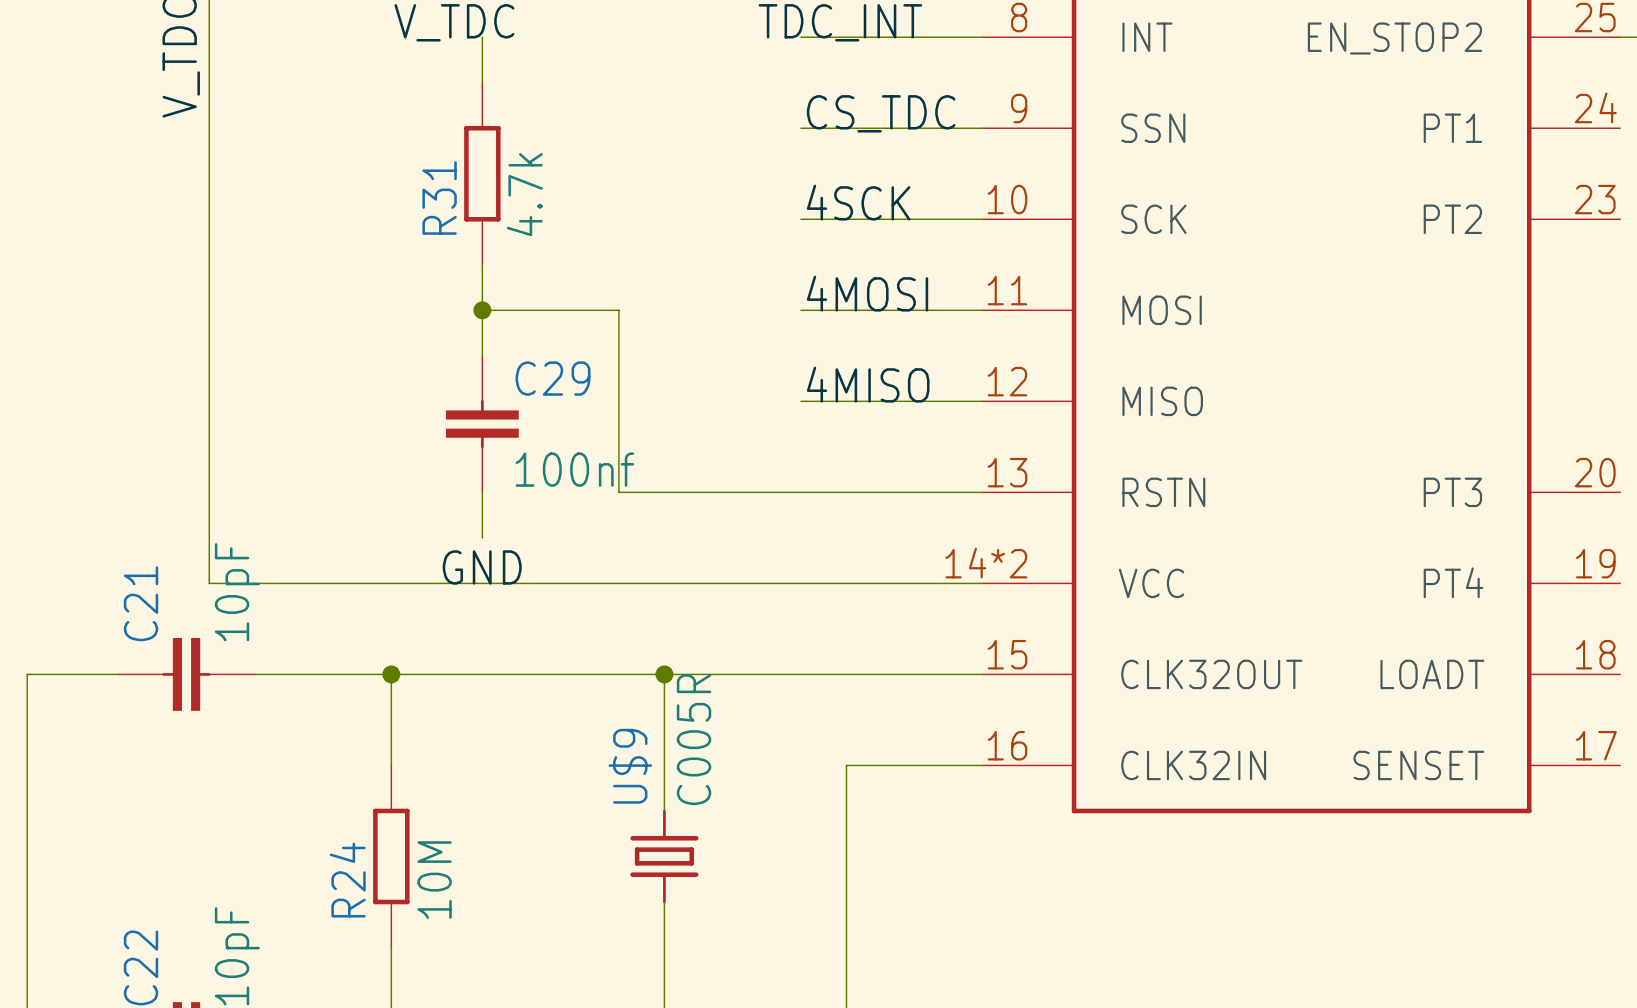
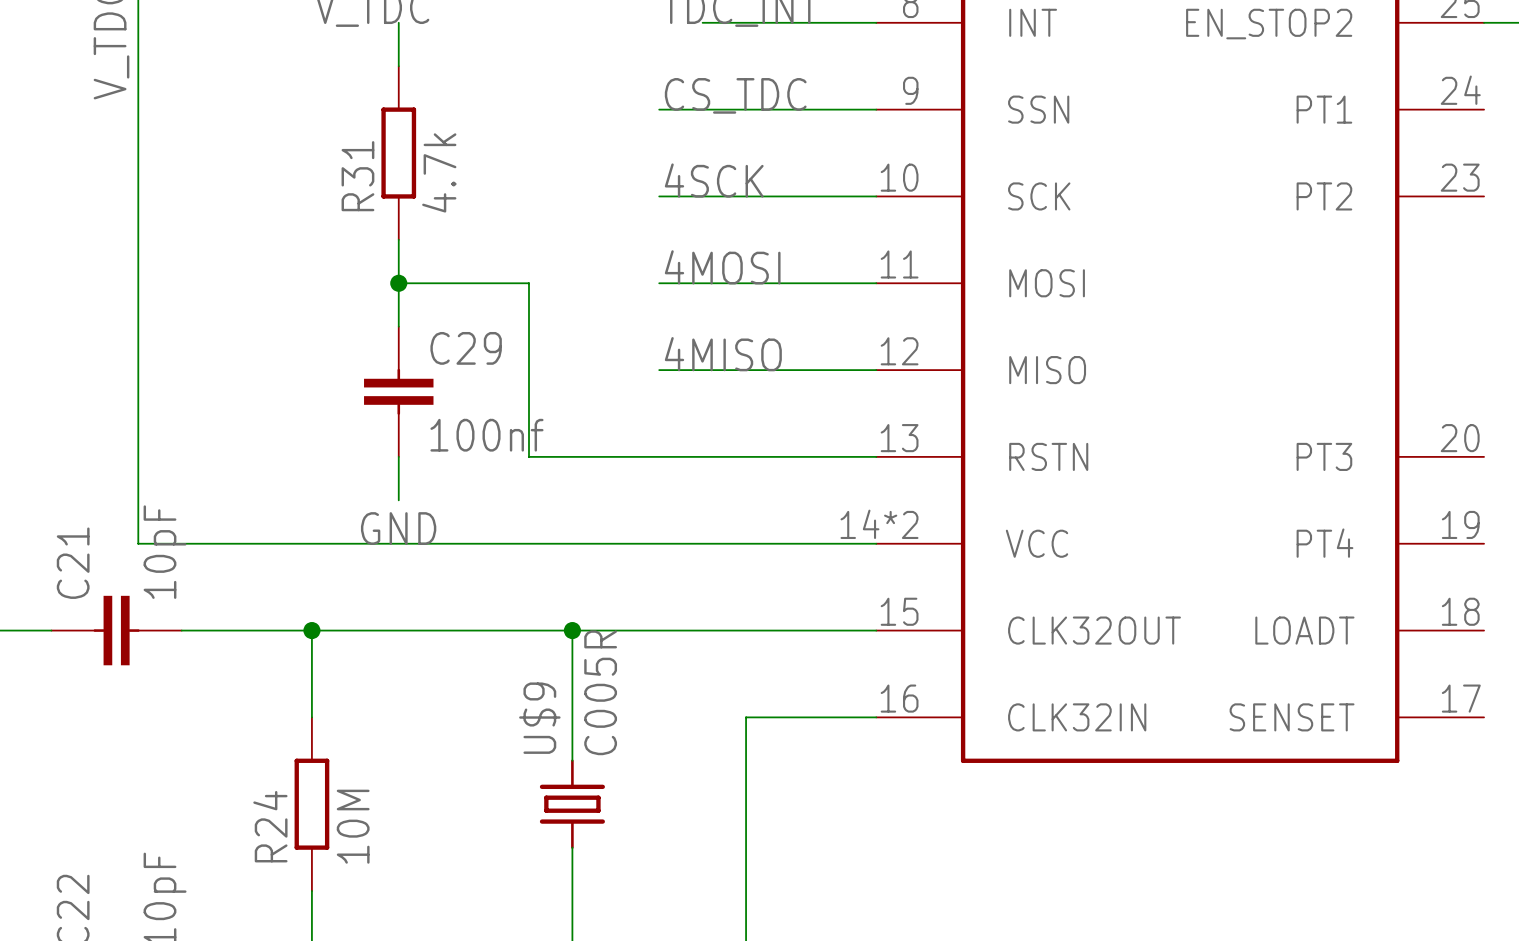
label position: CS_TDC (881, 113) -> CS_TDC (735, 95)
wire: none -> (659, 109) (702, 109)
label position: 4SCK (858, 202) -> 4SCK (714, 180)
wire: none -> (659, 196) (702, 196)
label position: 4MOSI (867, 293) -> 4MOSI (722, 267)
wire: none -> (659, 283) (702, 283)
label position: 4MISO (868, 384) -> 4MISO (723, 354)
wire: none -> (659, 370) (702, 370)

